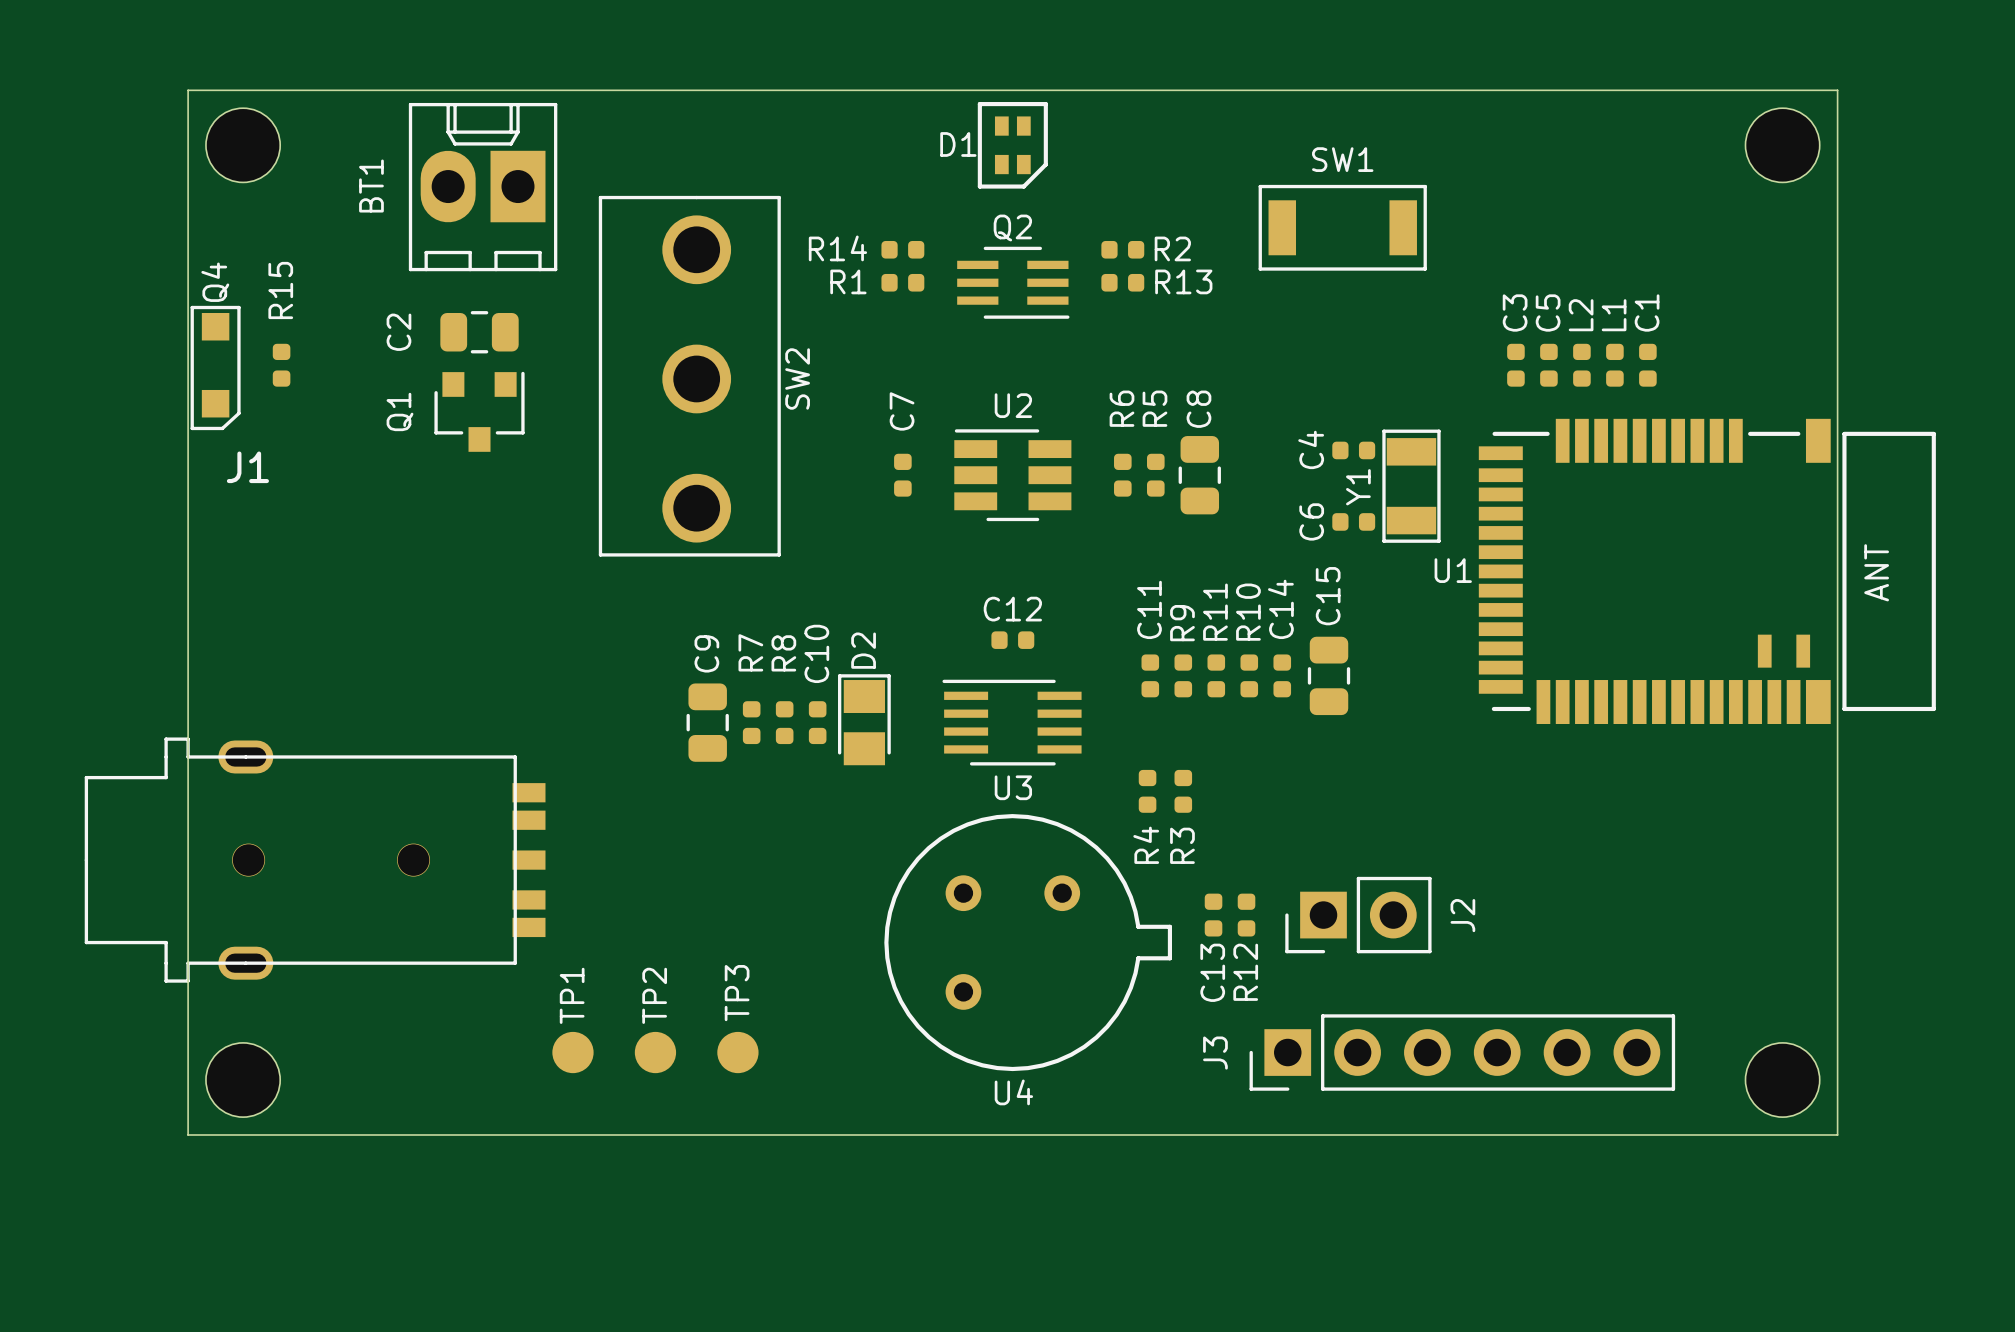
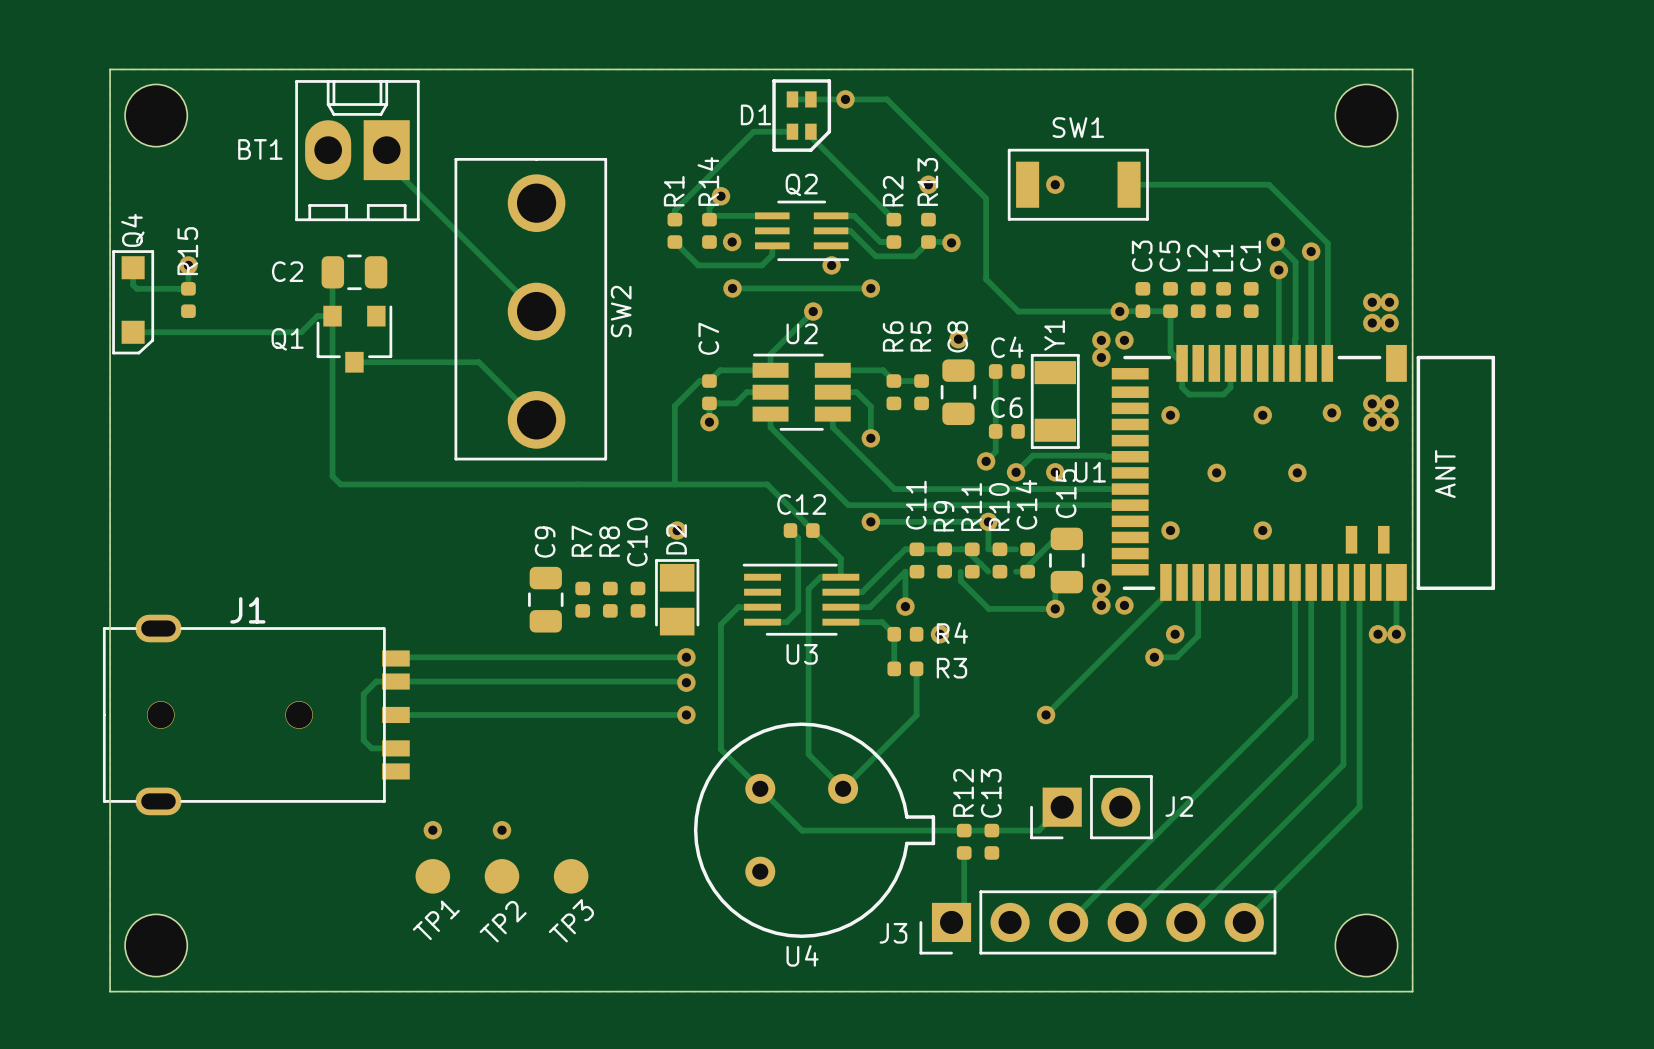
board edge: (1741, 90) (1837, 90) (1837, 1134) (188, 1134) -> (1412, 69) (1412, 991) (110, 991) (110, 945)
track: none -> (792, 99) (886, 99) (986, 198) (986, 279) (1018, 311) (1170, 311) (1170, 351) (1182, 363) (1182, 387) (1188, 394) (1223, 394) (1230, 387) (1230, 363)
via: none -> (845, 99)
part position: (1782, 145) -> (1366, 115)
track: none -> (792, 131) (753, 131) (674, 210) (674, 219)
track: none -> (810, 131) (810, 136) (893, 219)
BT1 name rotation: 0° (371, 186) -> 90° clockwise (260, 149)
track: none -> (386, 150) (386, 161) (536, 311)
via: none -> (928, 184)
via: none -> (1055, 184)
track: none -> (1129, 184) (1269, 184) (1327, 243) (1327, 363)
track: none -> (721, 196) (709, 207) (709, 219) (713, 215) (772, 215)
via: none -> (721, 196)
R2 name position: R2 (1172, 248) -> R2 (893, 191)
R14 rotation: 0° (902, 249) -> 90° clockwise (709, 230)
R14 position: (902, 249) -> (709, 230)
R2 rotation: 0° (1122, 249) -> 90° clockwise (893, 230)
R2 position: (1122, 249) -> (893, 230)
track: none -> (831, 215) (854, 215) (880, 242) (893, 242)
R13 name position: R13 (1183, 281) -> R13 (927, 181)
R1 rotation: 0° (902, 282) -> 90° clockwise (674, 230)
R1 position: (902, 282) -> (674, 230)
track: none -> (831, 230) (850, 230) (875, 256) (914, 256) (928, 242) (951, 242)
R13 rotation: 0° (1122, 282) -> 90° clockwise (928, 230)
R13 position: (1122, 282) -> (928, 230)
R15 name position: R15 (280, 290) -> R15 (187, 251)
track: none -> (674, 242) (698, 265) (761, 265) (772, 255) (772, 245)
via: none -> (732, 242)
track: none -> (1275, 242) (1295, 262) (1295, 363)
via: none -> (1275, 242)
via: none -> (951, 242)
track: none -> (1311, 251) (1311, 363)
via: none -> (1311, 251)
C3 name: C3 (1515, 313) -> L1 (1222, 258)
C5 name: C5 (1548, 313) -> C1 (1250, 256)
track: none -> (188, 265) (188, 288) (136, 288) (133, 285) (133, 267)
via: none -> (188, 265)
via: none -> (831, 265)
track: none -> (1278, 270) (1278, 363)
via: none -> (1278, 270)
C2 name rotation: 0° (398, 332) -> 90° clockwise (287, 271)
track: none -> (332, 272) (332, 476) (340, 484) (767, 484) (805, 522)
track: none -> (732, 288) (870, 288)
via: none -> (732, 288)
via: none -> (870, 288)
C3: none -> (1142, 300)
C5: none -> (1170, 300)
L2 position: (1581, 365) -> (1198, 300)
L1: (1614, 365) -> none
C1: (1647, 365) -> none
via: none -> (1372, 302)
via: none -> (1389, 302)
via: none -> (813, 311)
track: none -> (813, 311) (770, 354) (770, 370) (720, 370) (709, 381) (699, 381) (674, 405) (674, 484)
via: none -> (1119, 311)
track: none -> (332, 316) (317, 316) (301, 332) (133, 332)
via: none -> (1372, 323)
via: none -> (1389, 323)
Q1 name rotation: 0° (400, 411) -> 90° clockwise (287, 339)
via: none -> (958, 339)
via: none -> (1101, 340)
via: none -> (1124, 340)
via: none -> (1101, 357)
track: none -> (354, 362) (478, 362) (536, 419)
track: none -> (832, 370) (883, 370) (893, 381) (921, 381)
C4 name rotation: 0° (1311, 449) -> 90° clockwise (1007, 347)
track: none -> (995, 371) (995, 451) (986, 461)
C4 position: (1353, 450) -> (1006, 371)
J1 name position: J1 (247, 467) -> J1 (247, 610)
track: none -> (770, 392) (746, 392) (735, 403) (709, 403) (709, 422)
track: none -> (832, 392) (856, 392) (870, 406) (870, 438)
Y1 position: (1411, 486) -> (1055, 401)
Y1 name position: Y1 (1358, 487) -> Y1 (1054, 335)
via: none -> (1372, 403)
via: none -> (1389, 403)
via: none -> (1331, 412)
track: none -> (770, 414) (770, 427) (848, 505) (1130, 505)
track: none -> (832, 414) (832, 427) (894, 489) (1130, 489)
via: none -> (1170, 415)
via: none -> (1262, 415)
via: none -> (709, 422)
via: none -> (1372, 422)
via: none -> (1389, 422)
C6 name rotation: 0° (1311, 521) -> 90° clockwise (1006, 407)
C6 position: (1353, 521) -> (1006, 431)
via: none -> (870, 438)
track: none -> (1130, 456) (1032, 455) (1016, 472)
via: none -> (986, 461)
via: none -> (1016, 472)
via: none -> (1055, 472)
via: none -> (1216, 472)
via: none -> (1297, 472)
U1 position: (1707, 571) -> (1303, 472)
track: none -> (870, 521) (988, 521) (988, 549) (1016, 549)
via: none -> (870, 521)
via: none -> (988, 521)
track: none -> (805, 522) (840, 558) (840, 577) (820, 577) (808, 589) (808, 754) (843, 788) (916, 715) (916, 668)
via: none -> (677, 530)
track: none -> (790, 530) (798, 538) (798, 610) (786, 622) (762, 622)
via: none -> (1170, 530)
via: none -> (1262, 530)
track: none -> (1055, 538) (1022, 571) (1016, 571)
track: none -> (897, 557) (862, 592) (840, 592)
track: none -> (897, 557) (905, 549) (965, 549) (980, 563)
track: none -> (980, 563) (988, 571)
track: none -> (960, 571) (960, 580) (988, 608) (1055, 608) (1055, 582)
track: none -> (1165, 582) (1165, 595) (1046, 714)
track: none -> (1198, 582) (1198, 635) (1176, 657) (1154, 657)
track: none -> (1295, 582) (1295, 696) (1068, 922)
track: none -> (1311, 582) (1311, 738) (1127, 922)
track: none -> (1343, 582) (1343, 764) (1185, 922)
track: none -> (1359, 582) (1359, 807) (1244, 922)
track: none -> (1396, 582) (1396, 634)
via: none -> (1101, 588)
via: none -> (1101, 605)
via: none -> (1124, 605)
track: none -> (905, 606) (905, 571) (869, 607) (840, 607)
via: none -> (905, 606)
track: none -> (762, 607) (738, 607) (721, 624) (721, 749) (802, 830) (1038, 830) (1062, 807)
via: none -> (1055, 608)
J1 footprint: [84, 737, 546, 983] -> [102, 614, 410, 816]
track: none -> (840, 622) (882, 622) (894, 634) (894, 668)
via: none -> (940, 634)
via: none -> (1175, 634)
via: none -> (1378, 634)
via: none -> (1396, 634)
track: none -> (686, 657) (395, 658)
via: none -> (686, 657)
R4 rotation: 0° (1147, 791) -> 90° clockwise (905, 634)
R4 position: (1147, 791) -> (905, 634)
R3 rotation: 0° (1183, 791) -> 90° clockwise (905, 668)
R3 position: (1183, 791) -> (905, 668)
via: none -> (1154, 657)
track: none -> (686, 682) (376, 681) (363, 694) (363, 740) (371, 748) (395, 748)
via: none -> (686, 682)
R4 name position: R4 (1146, 845) -> R4 (952, 633)
R3 name position: R3 (1182, 845) -> R3 (951, 668)
track: none -> (395, 714) (686, 714)
via: none -> (686, 714)
via: none -> (1046, 714)
C13 position: (1213, 915) -> (991, 841)
R12 position: (1246, 915) -> (964, 841)
J2 position: (1358, 915) -> (1091, 807)
J2 name rotation: 0° (1462, 915) -> 90° clockwise (1179, 806)
U4 position: (1028, 942) -> (814, 830)
C13 name position: C13 (1212, 972) -> C13 (991, 793)
R12 name position: R12 (1245, 972) -> R12 (963, 792)
TP3 name rotation: 0° (737, 993) -> 45° clockwise (571, 920)
TP3 name position: TP3 (737, 993) -> TP3 (571, 920)
TP1 name rotation: 0° (572, 995) -> 45° clockwise (436, 920)
TP1 name position: TP1 (572, 995) -> TP1 (436, 920)
TP2 name rotation: 0° (654, 995) -> 45° clockwise (503, 921)
TP2 name position: TP2 (654, 995) -> TP2 (503, 921)
via: none -> (432, 830)
via: none -> (501, 830)
track: none -> (964, 852) (964, 909) (951, 922)
J3 position: (1462, 1052) -> (1097, 922)
J3 name rotation: 0° (1215, 1053) -> 90° clockwise (893, 933)
part position: (243, 1080) -> (156, 945)
part position: (1782, 1080) -> (1366, 945)

